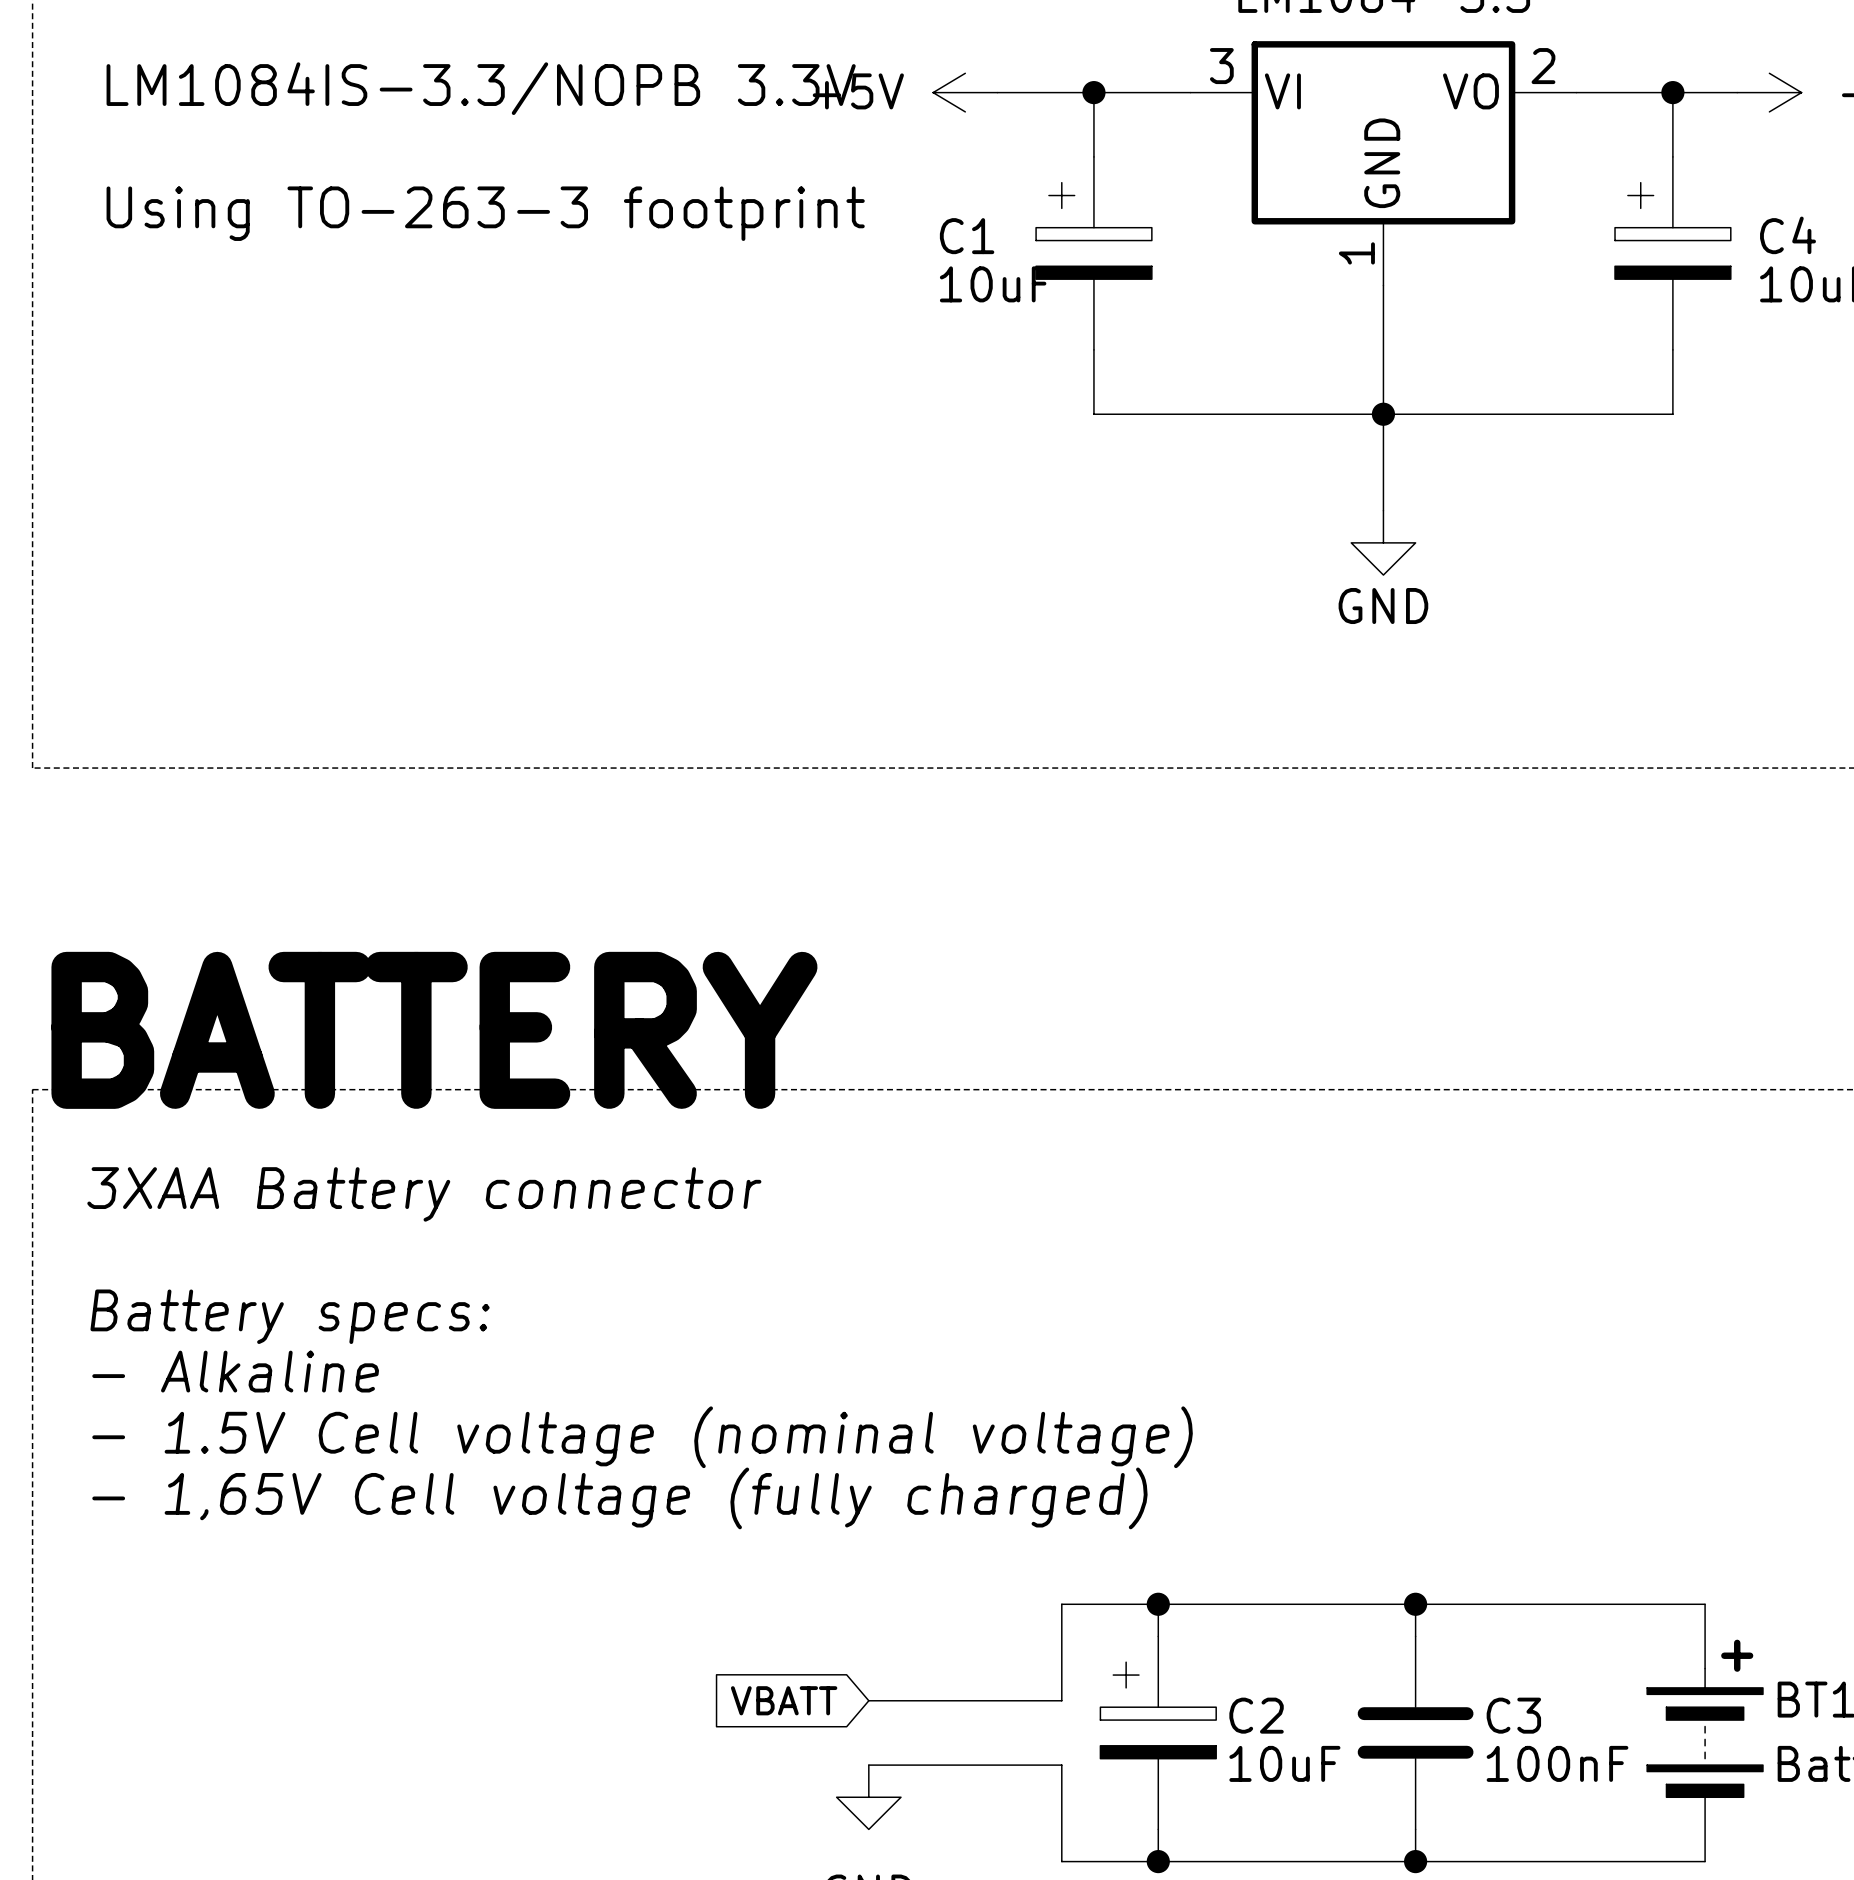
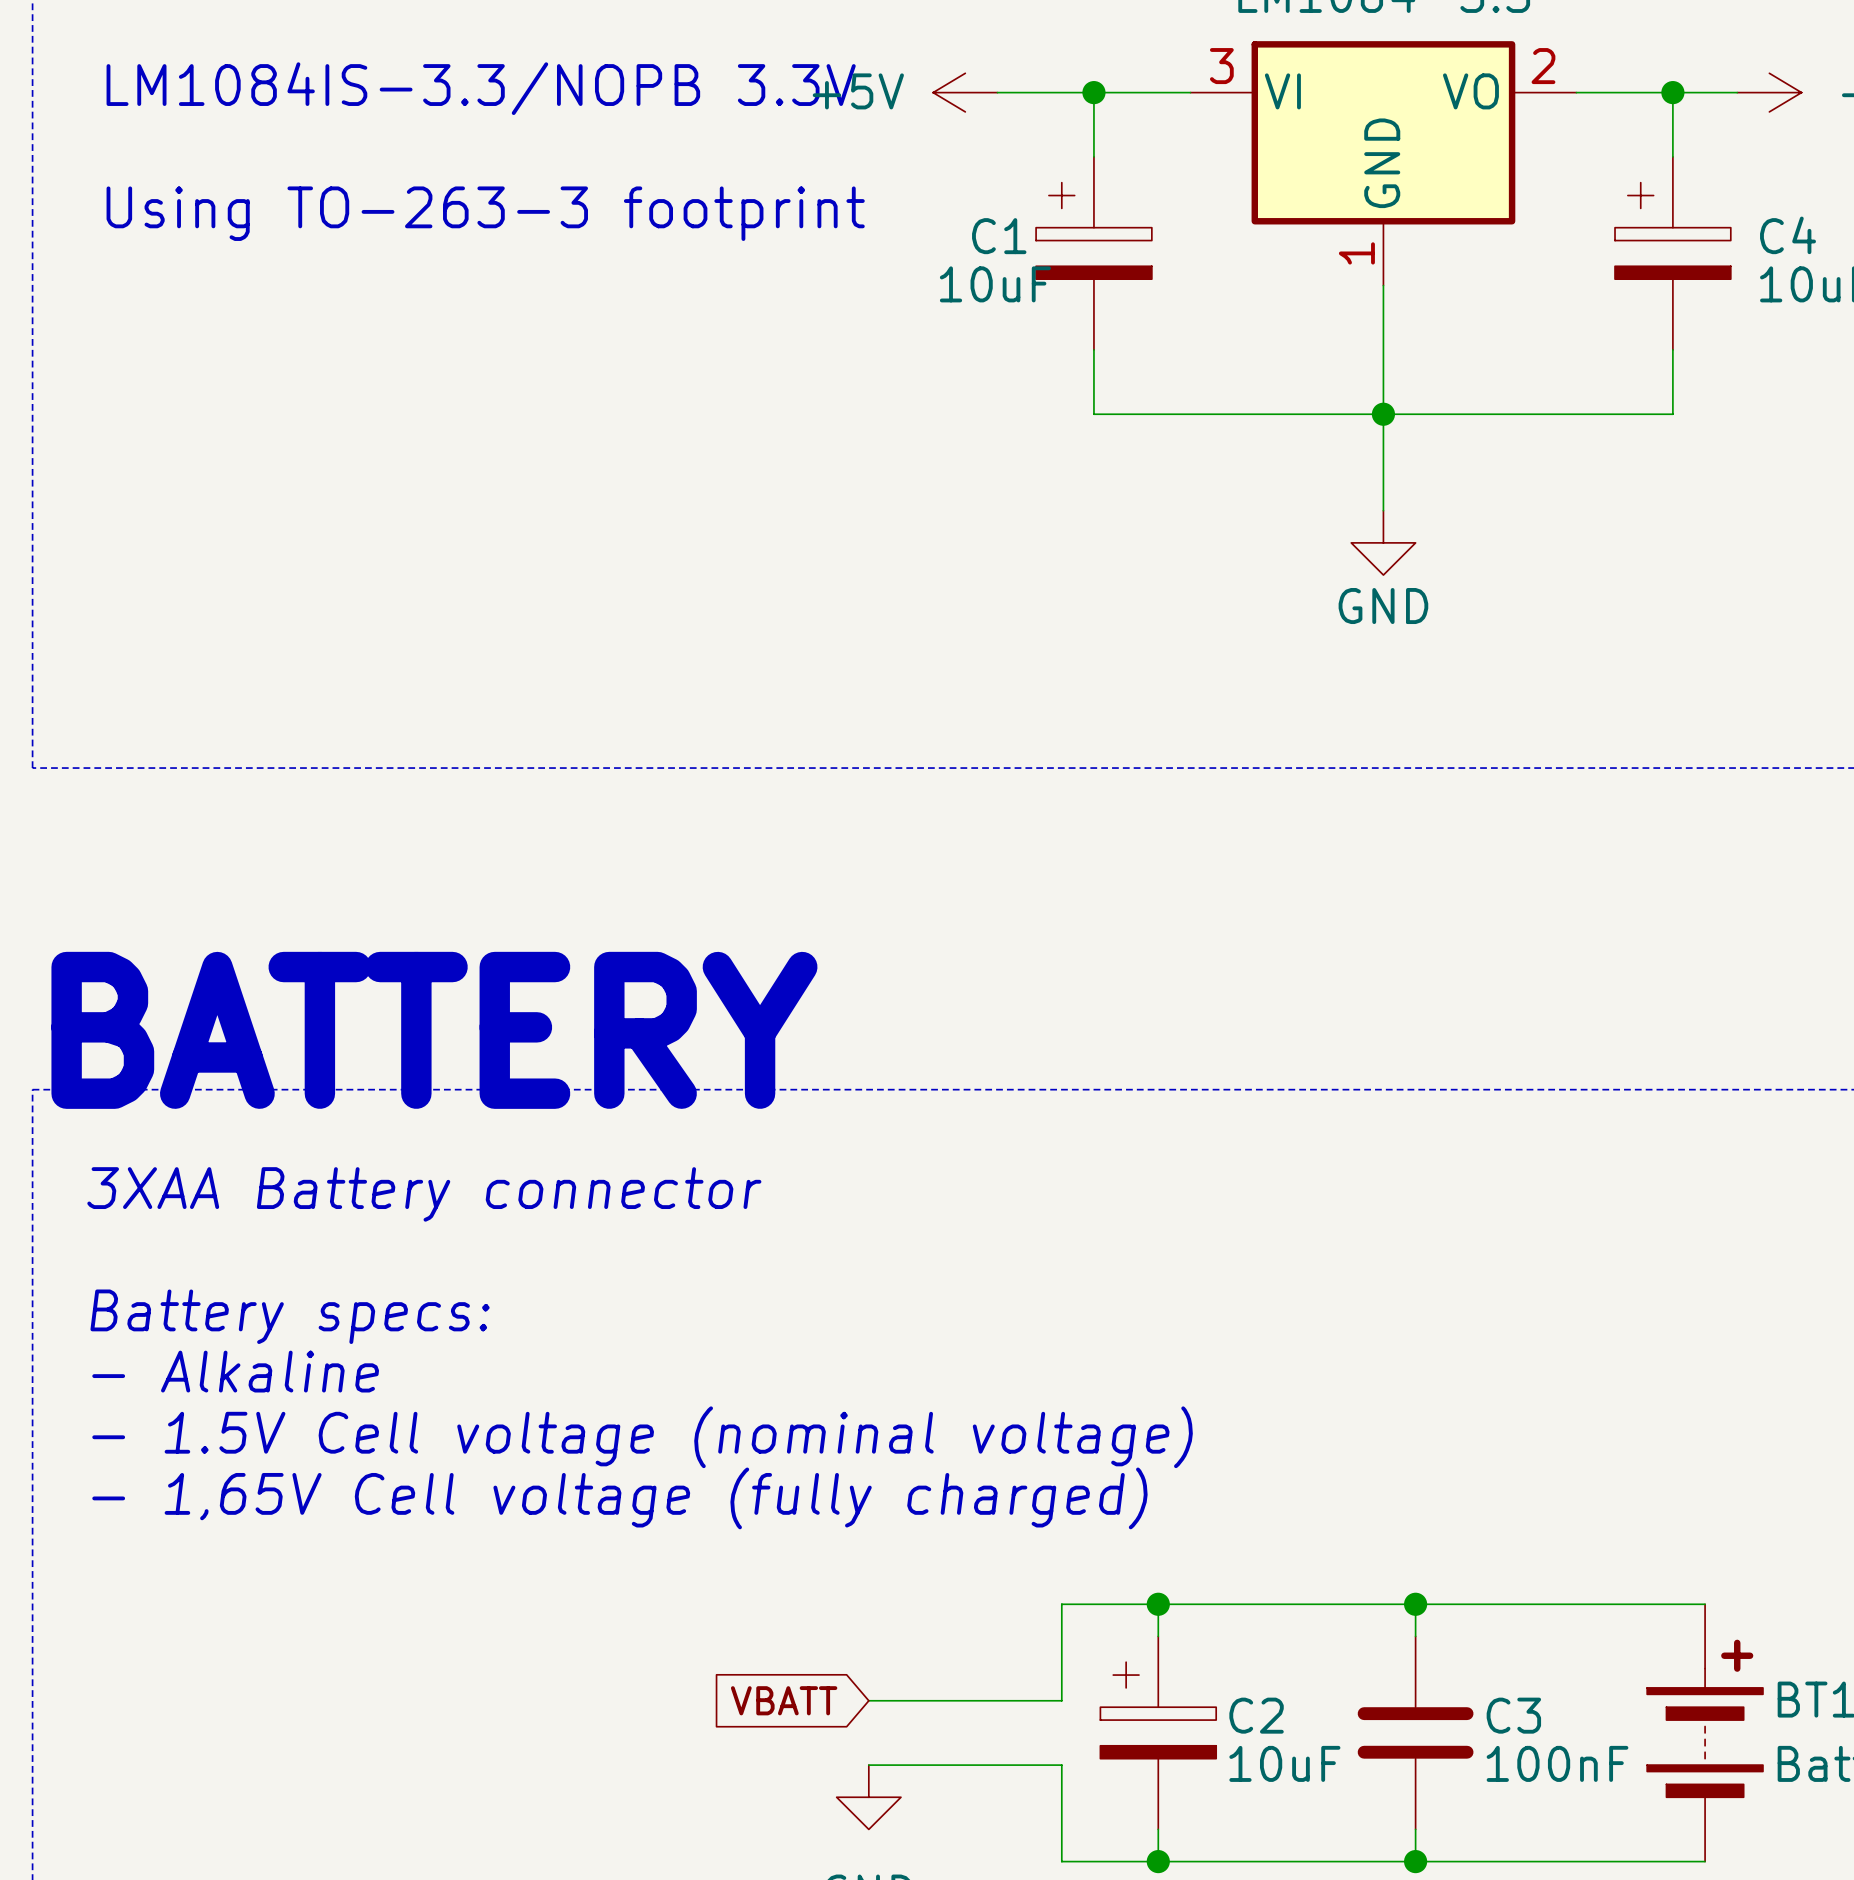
C1 name position: C1 (967, 236) -> C1 (999, 236)

